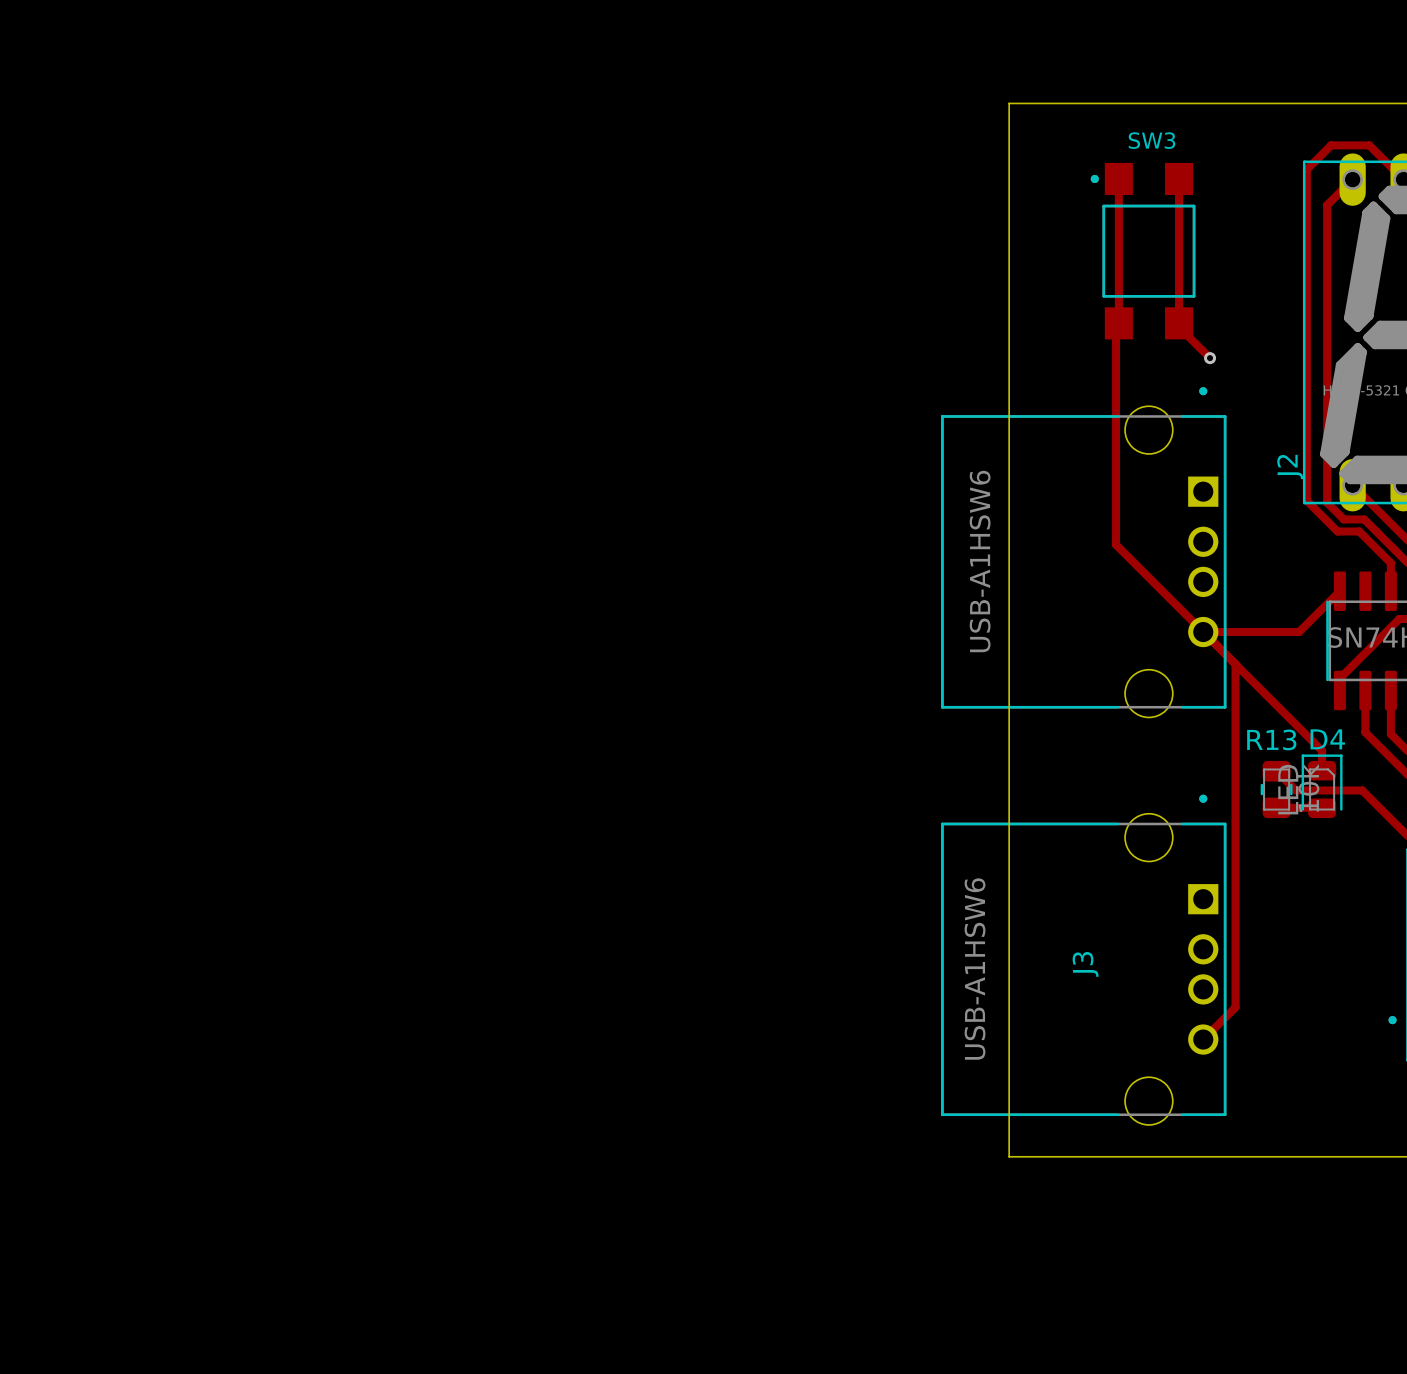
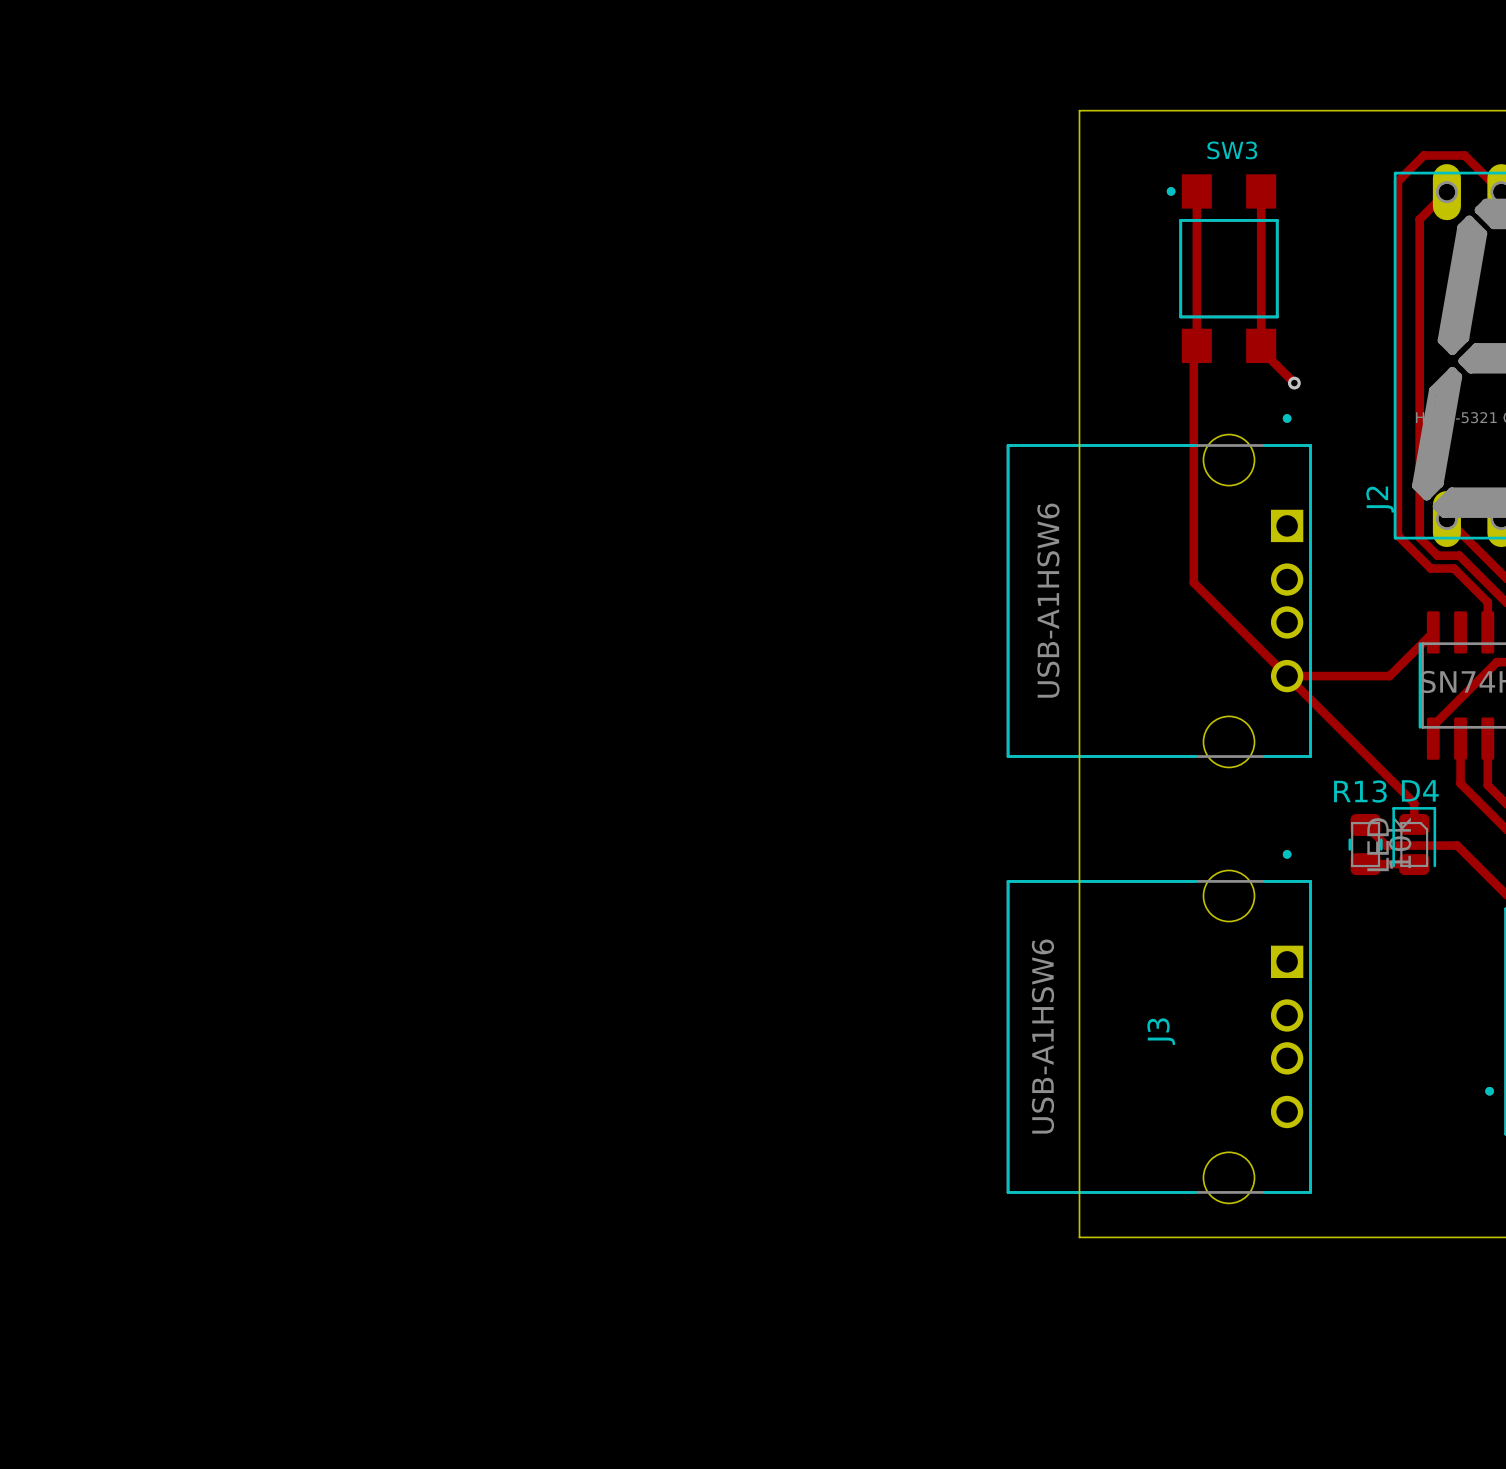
track: (1235, 664) (1235, 1007) (1203, 1039) -> none

